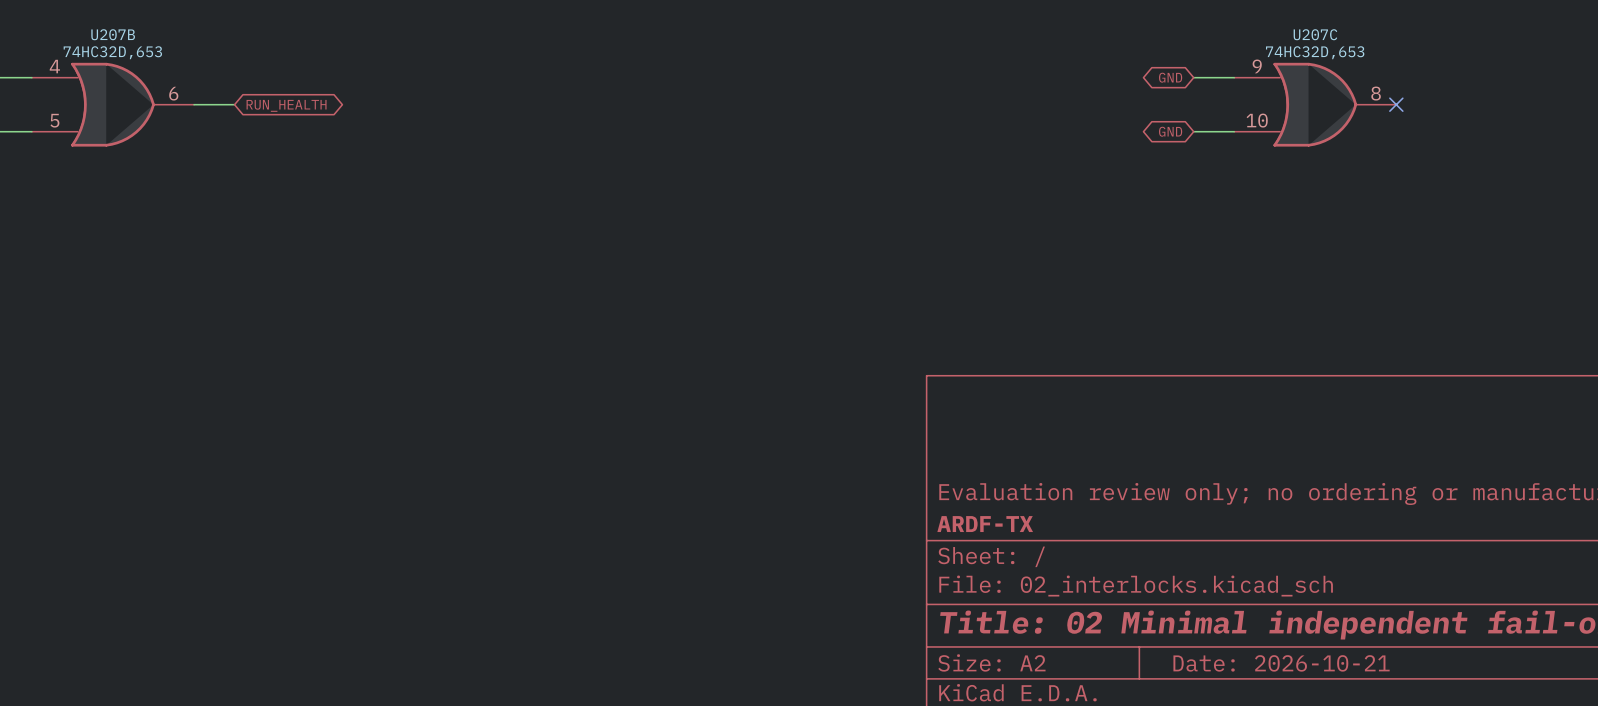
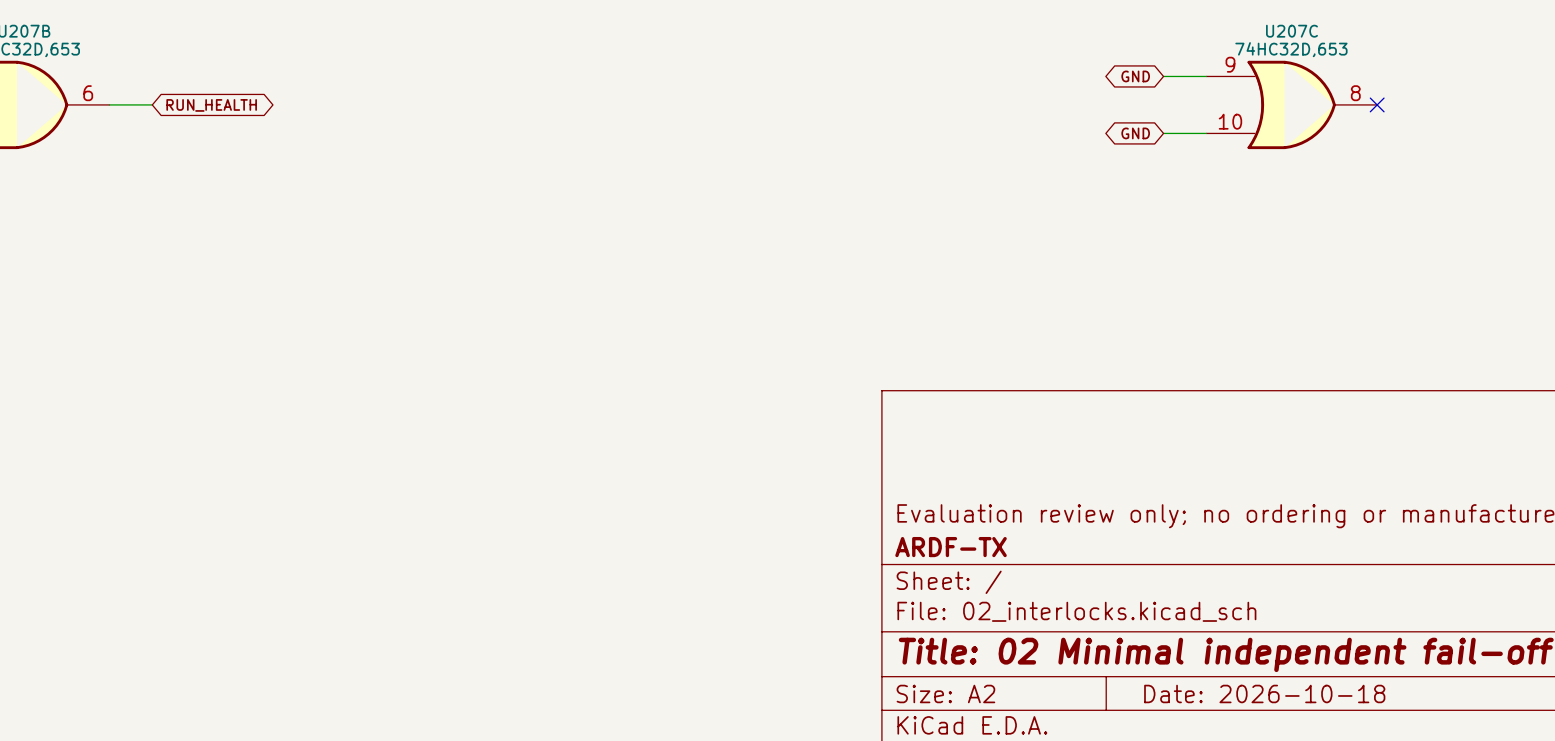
title block: Date: 2026-10-21 (1281, 663) -> Date: 2026-10-18 (1264, 693)

